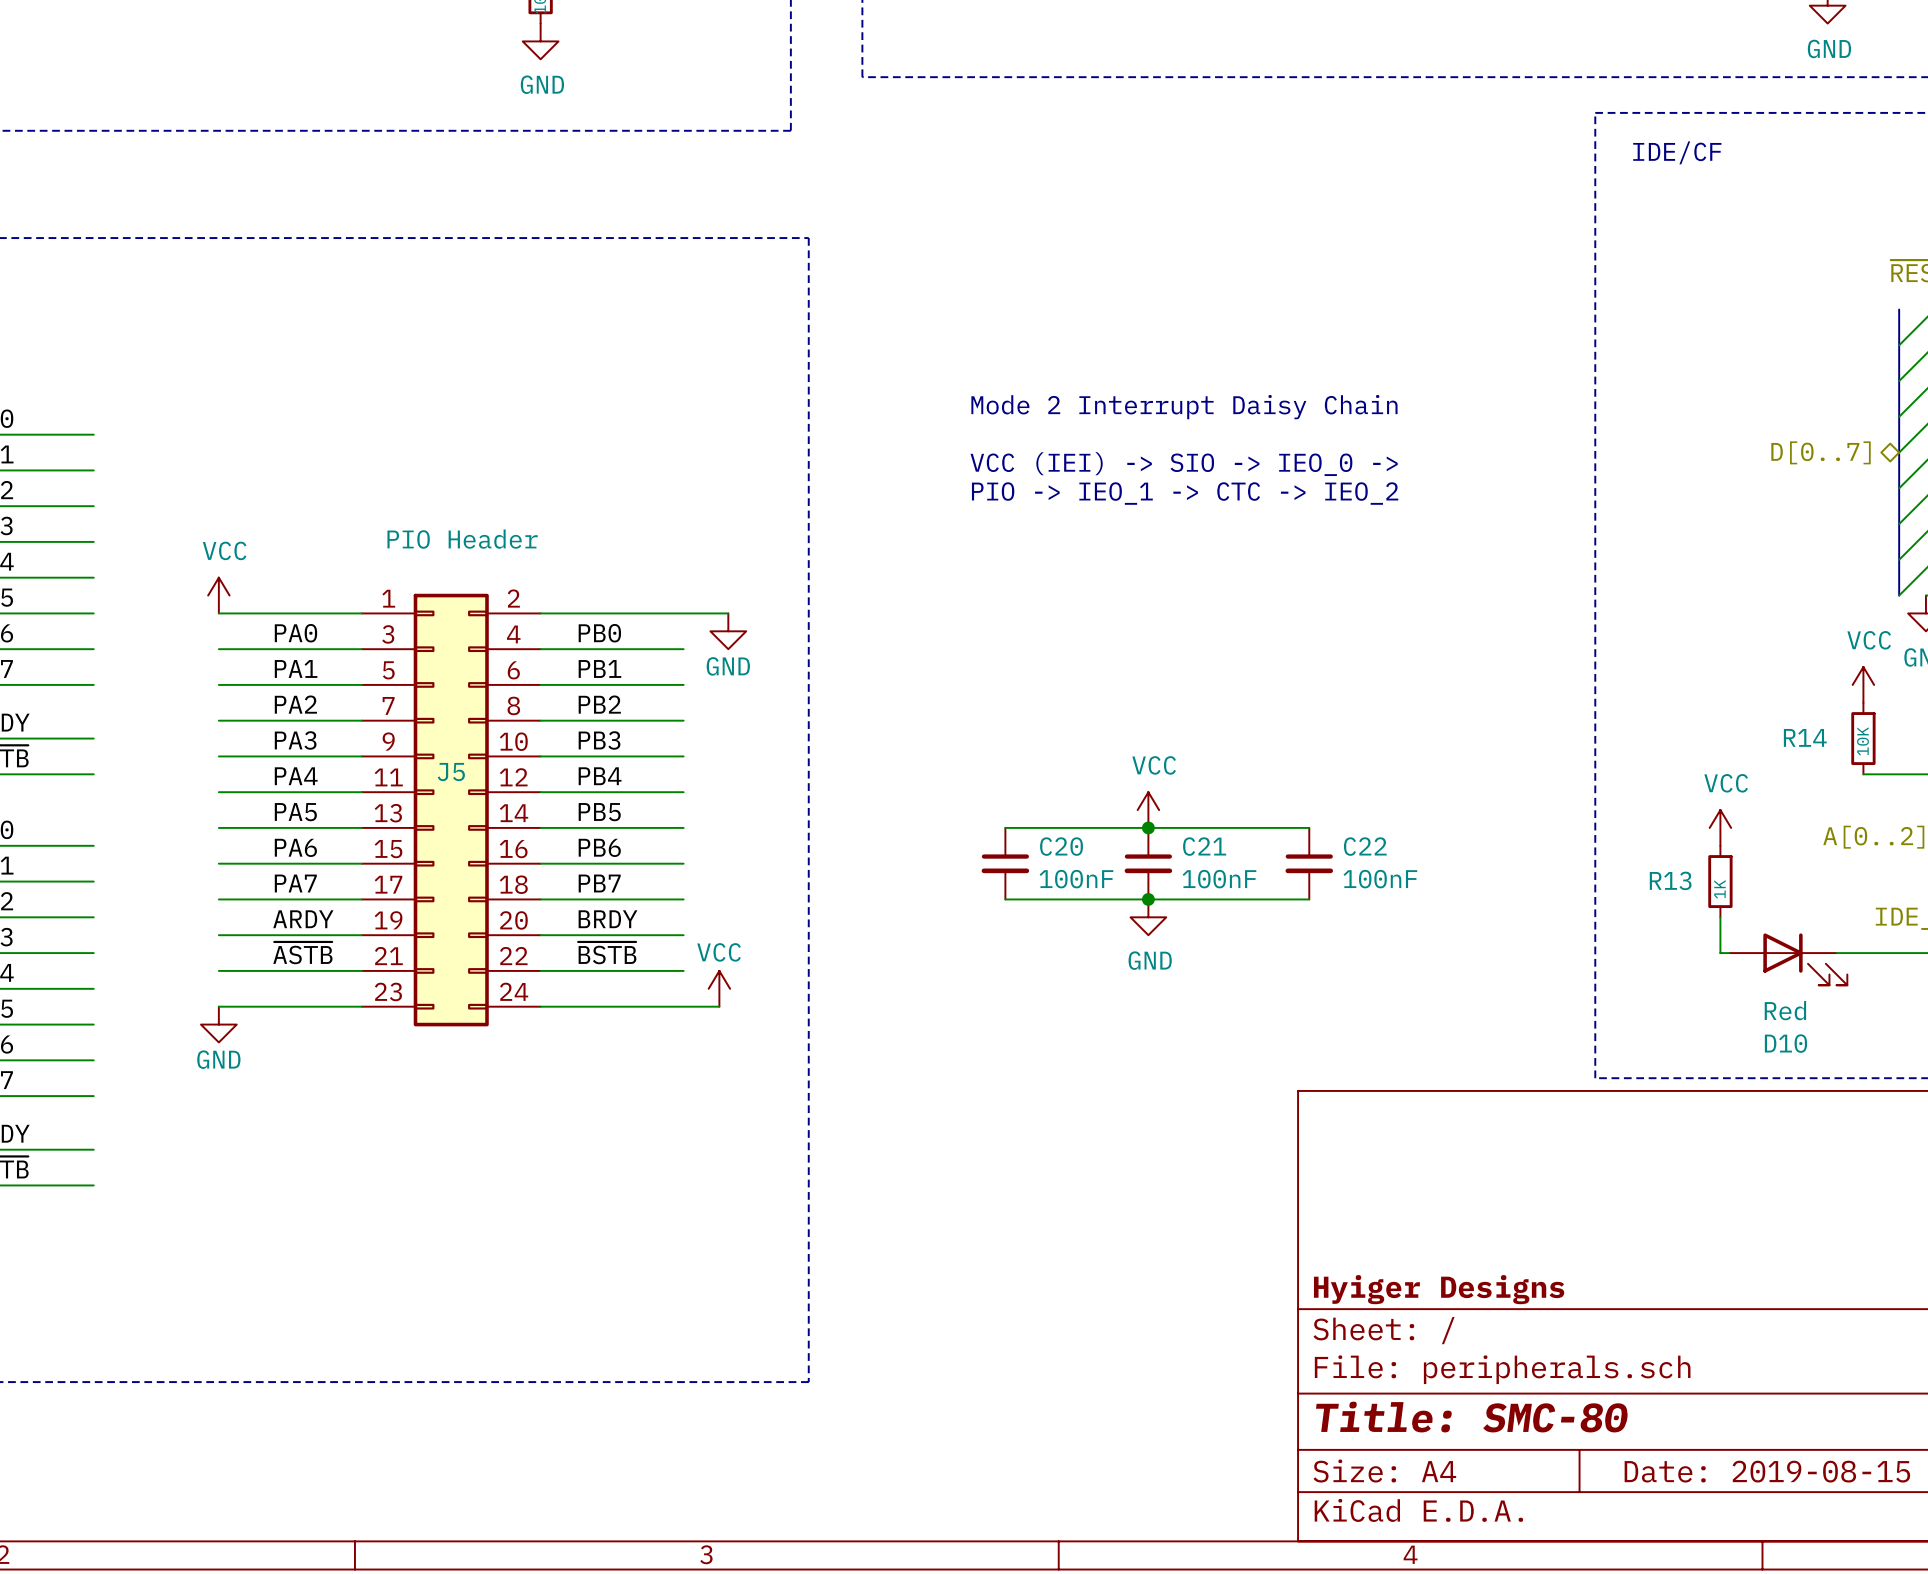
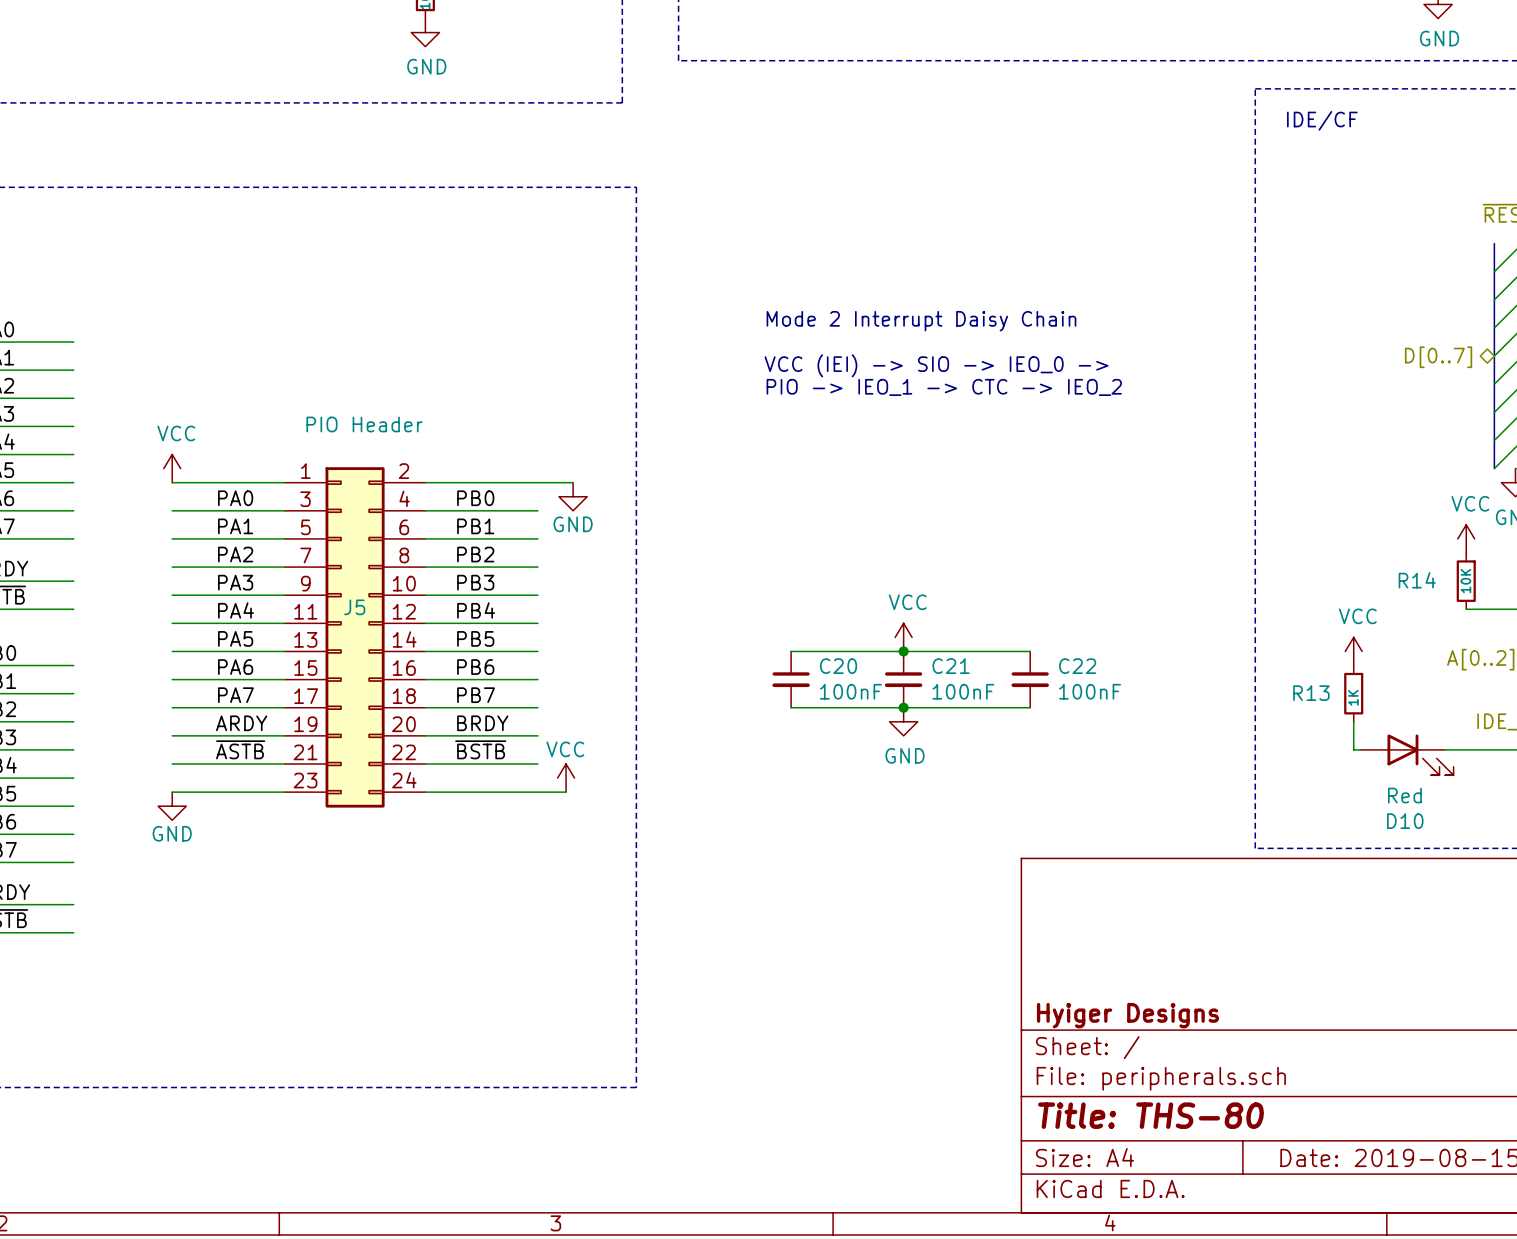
title block: Title: SMC-80 (1472, 1417) -> Title: THS-80 (1151, 1115)

